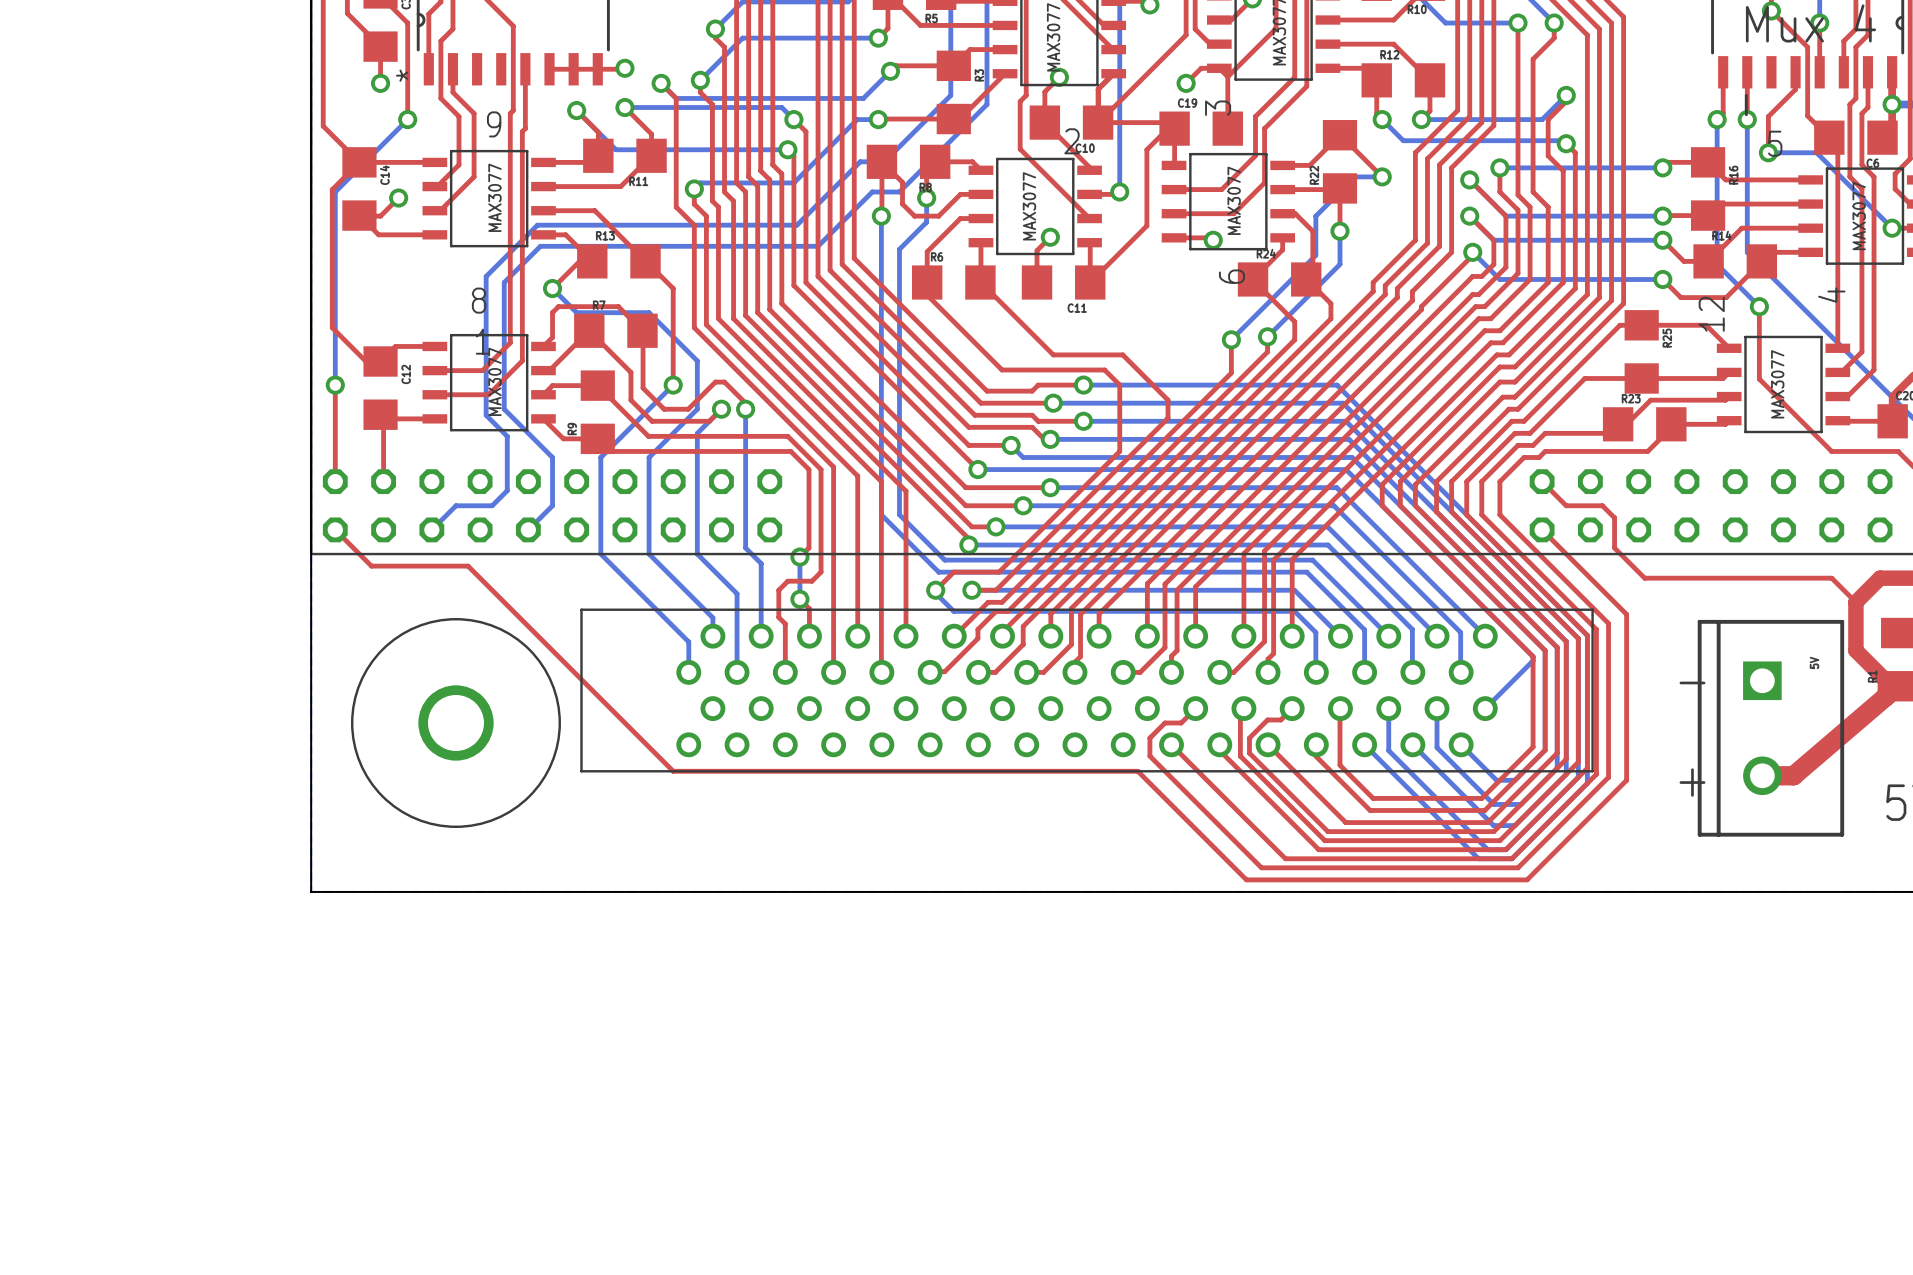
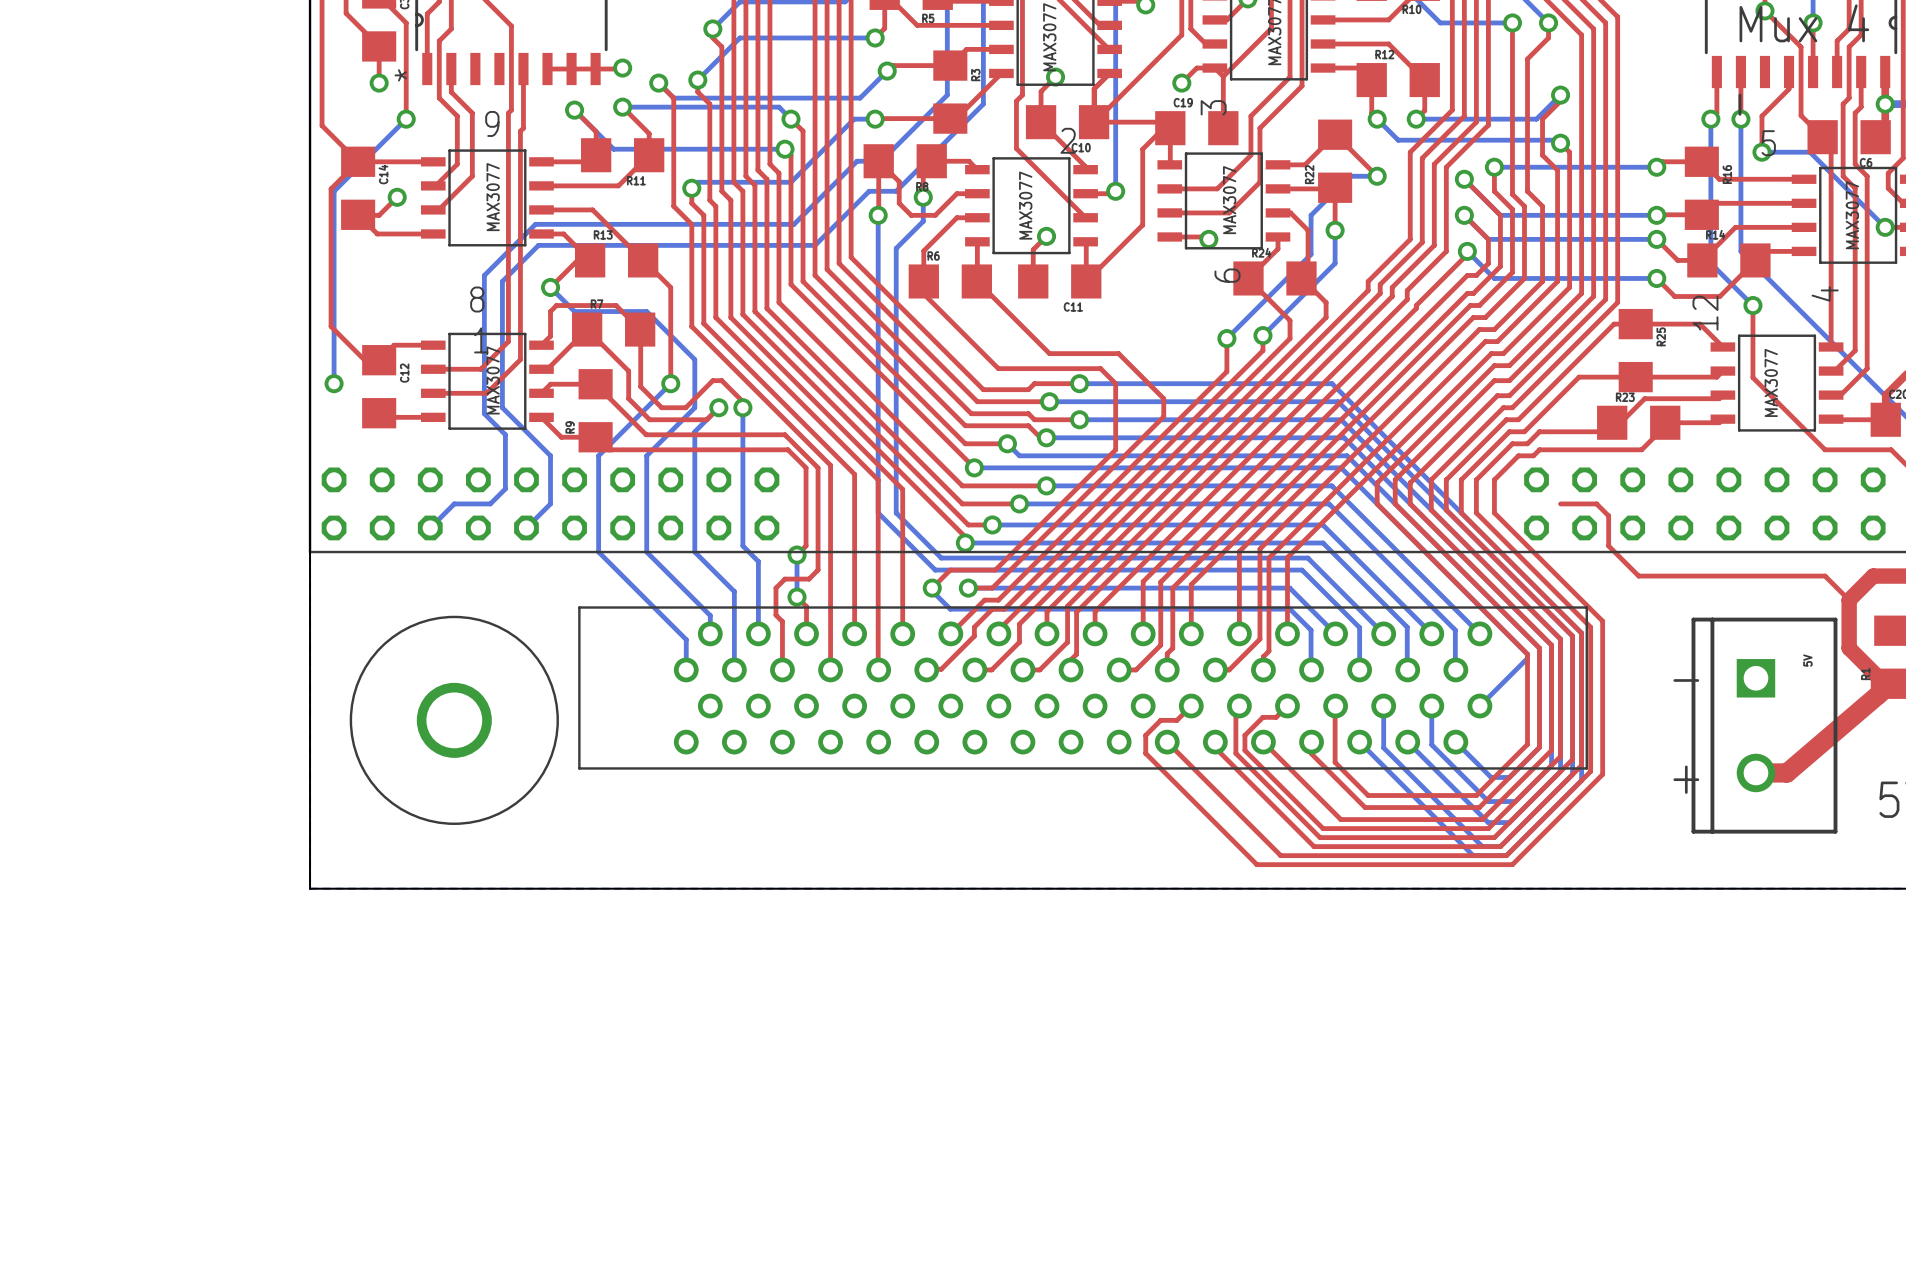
top track: (335, 385) (335, 481) -> none
top track: (383, 417) (383, 481) -> none
top track: (1542, 481) (1566, 505) -> none
top track: (335, 529) (371, 566) (468, 566) (673, 771) (1137, 771) (1246, 879) (1527, 879) (1626, 780) (1626, 614) (1542, 529) -> none

